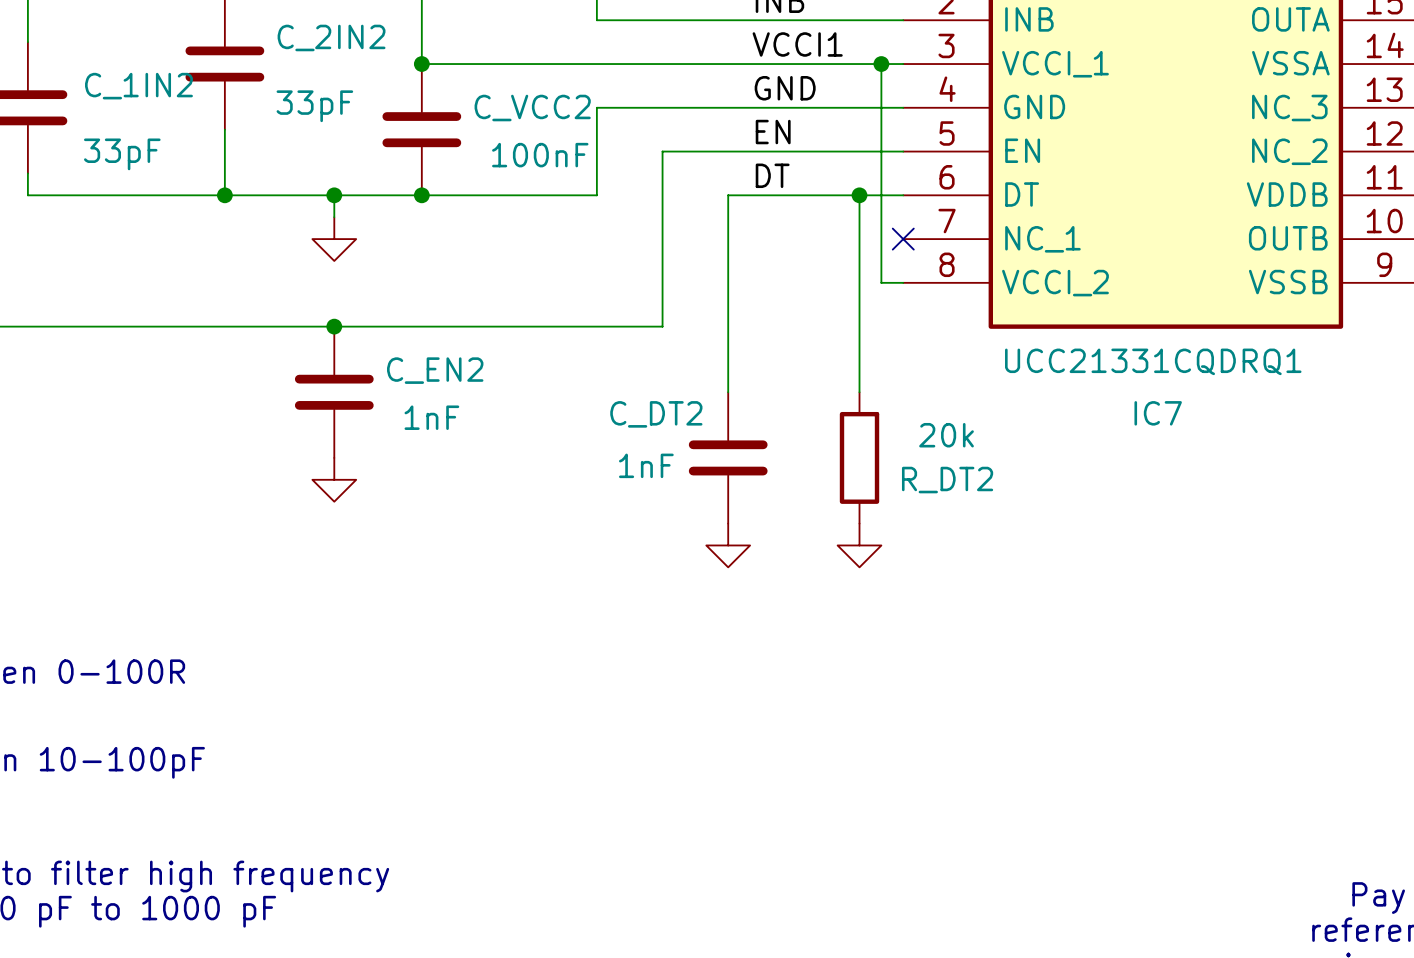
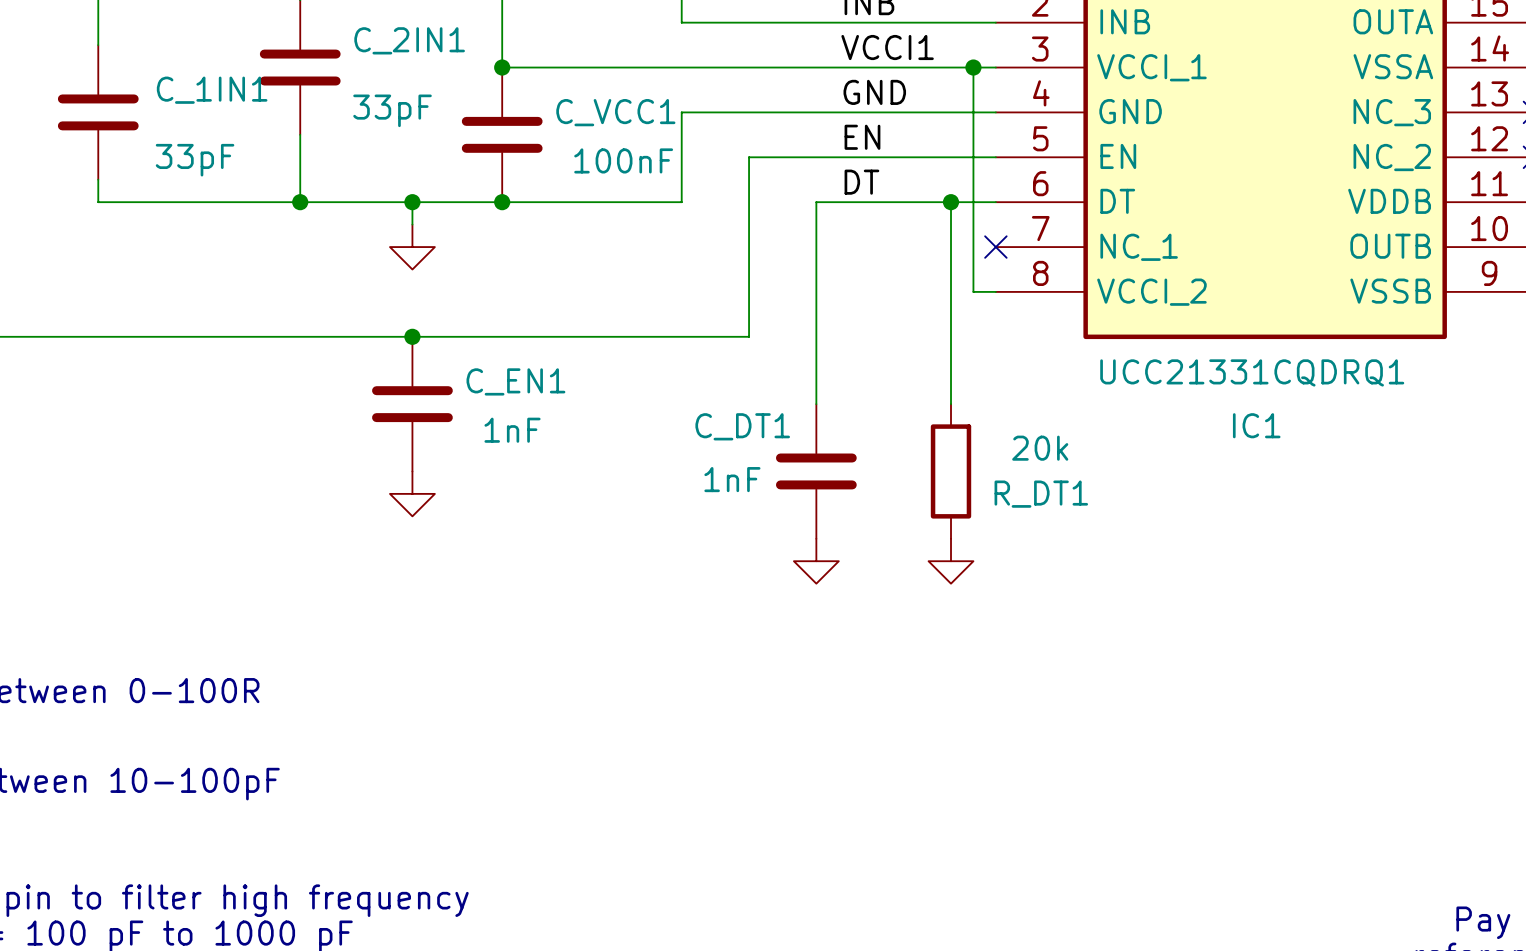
C_2IN2 name: C_2IN2 (331, 37) -> C_2IN1 (409, 40)
C_1IN2 name: C_1IN2 (138, 86) -> C_1IN1 (212, 90)
C_VCC2 name: C_VCC2 (532, 108) -> C_VCC1 (615, 112)
C_EN2 name: C_EN2 (435, 370) -> C_EN1 (515, 381)
IC7 name: IC7 (1158, 413) -> IC1 (1256, 425)
C_DT2 name: C_DT2 (656, 414) -> C_DT1 (742, 426)
R_DT2 name: R_DT2 (947, 480) -> R_DT1 (1041, 494)

